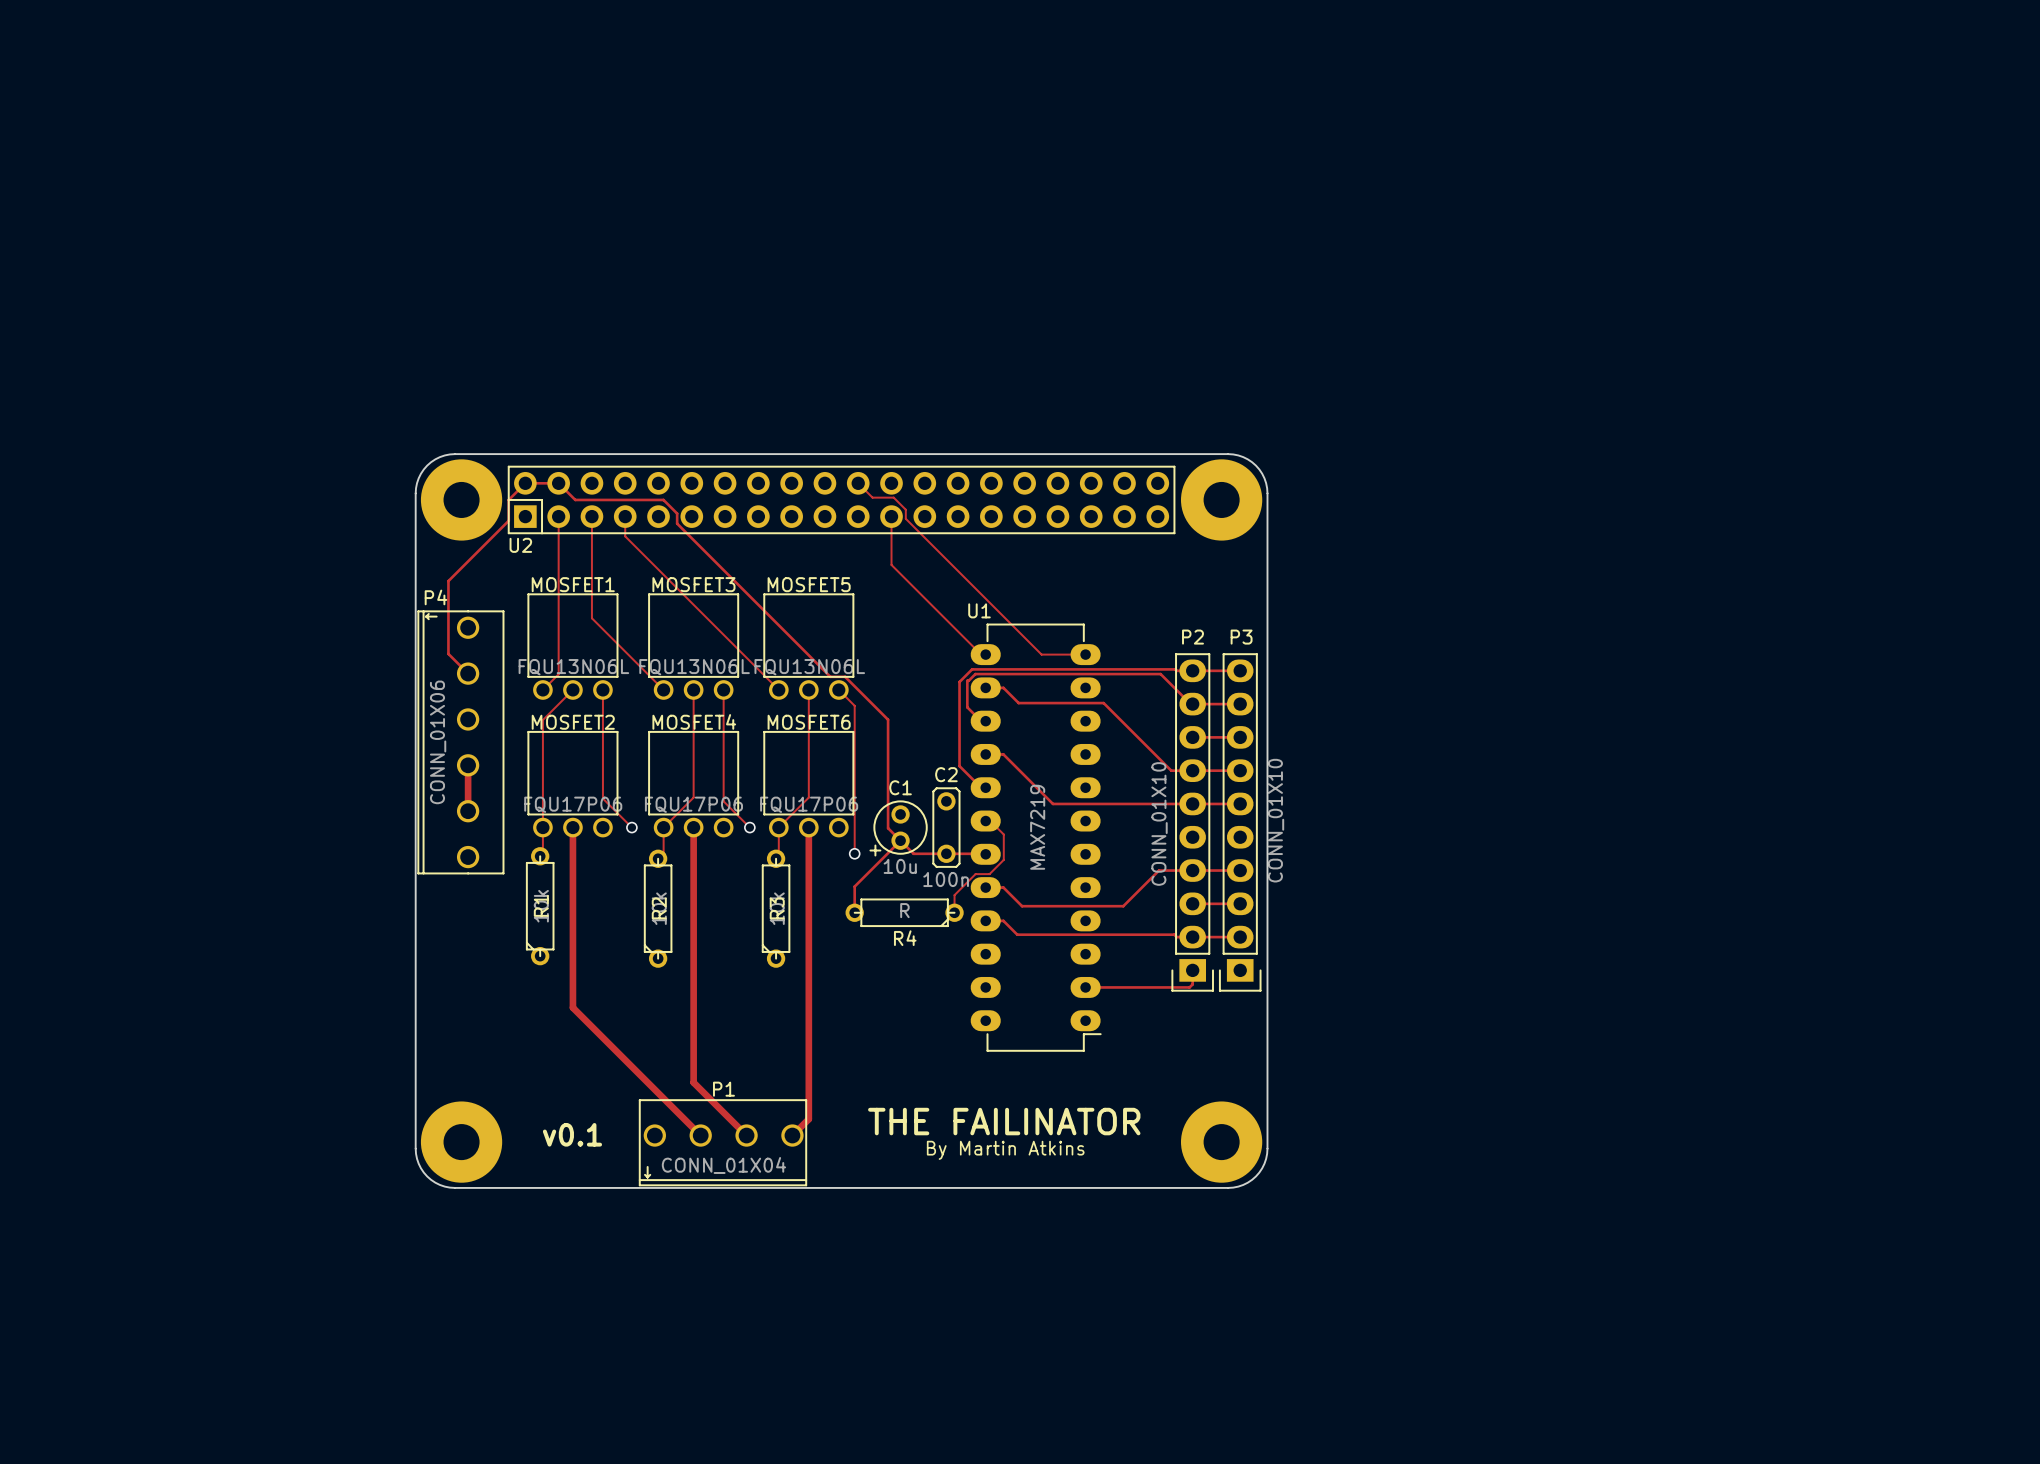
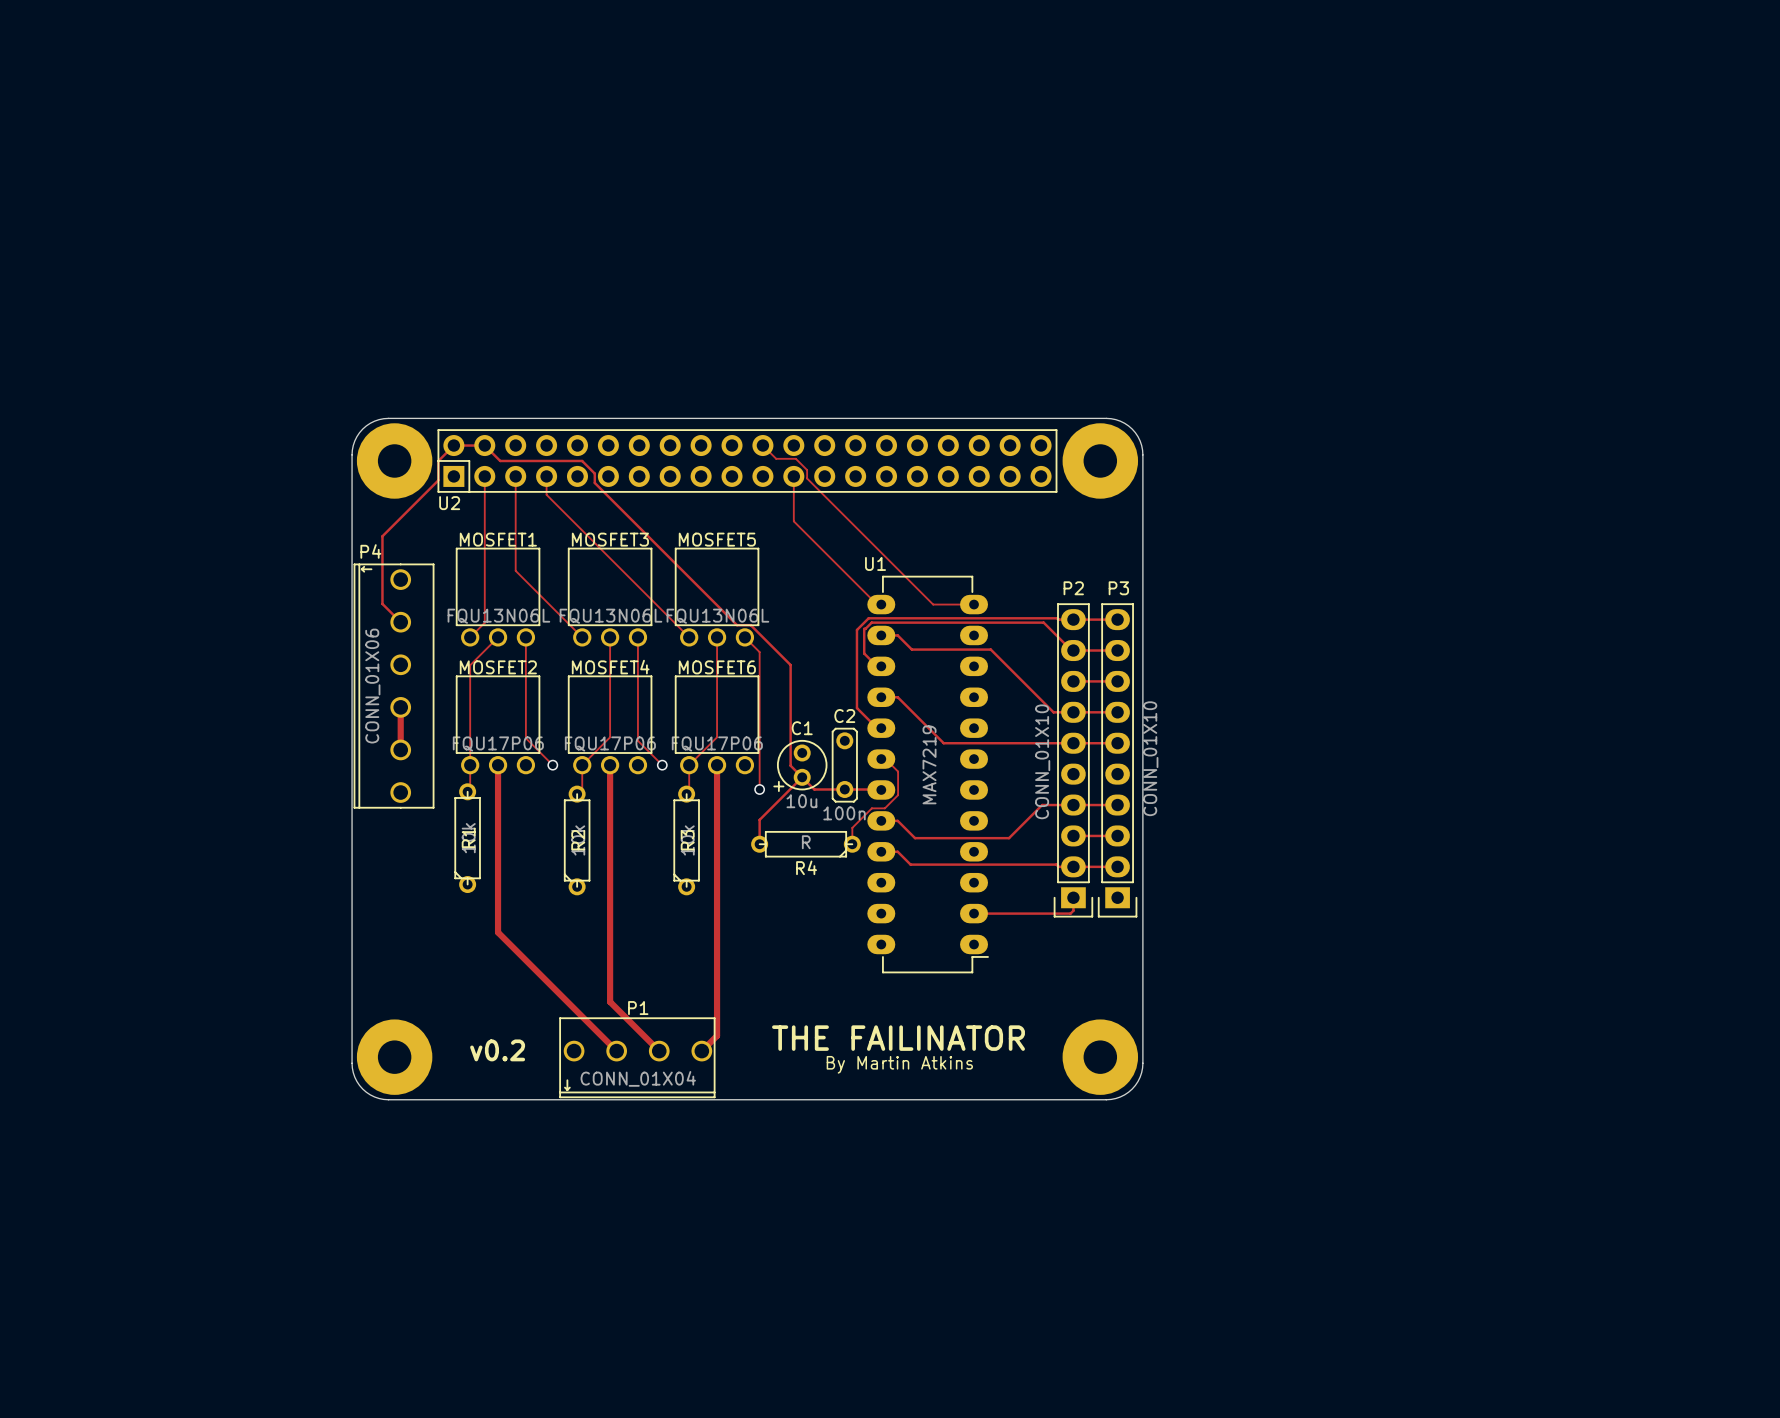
text: v0.1 (572, 1134) -> v0.2 (497, 1050)

